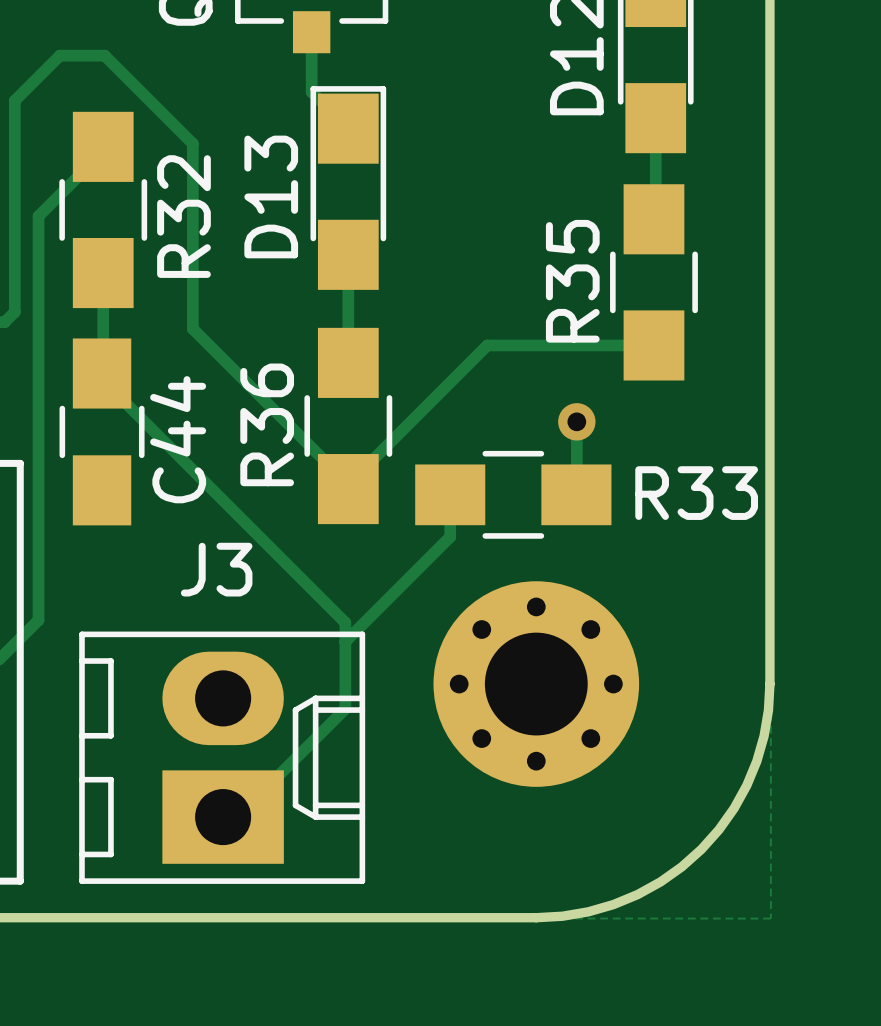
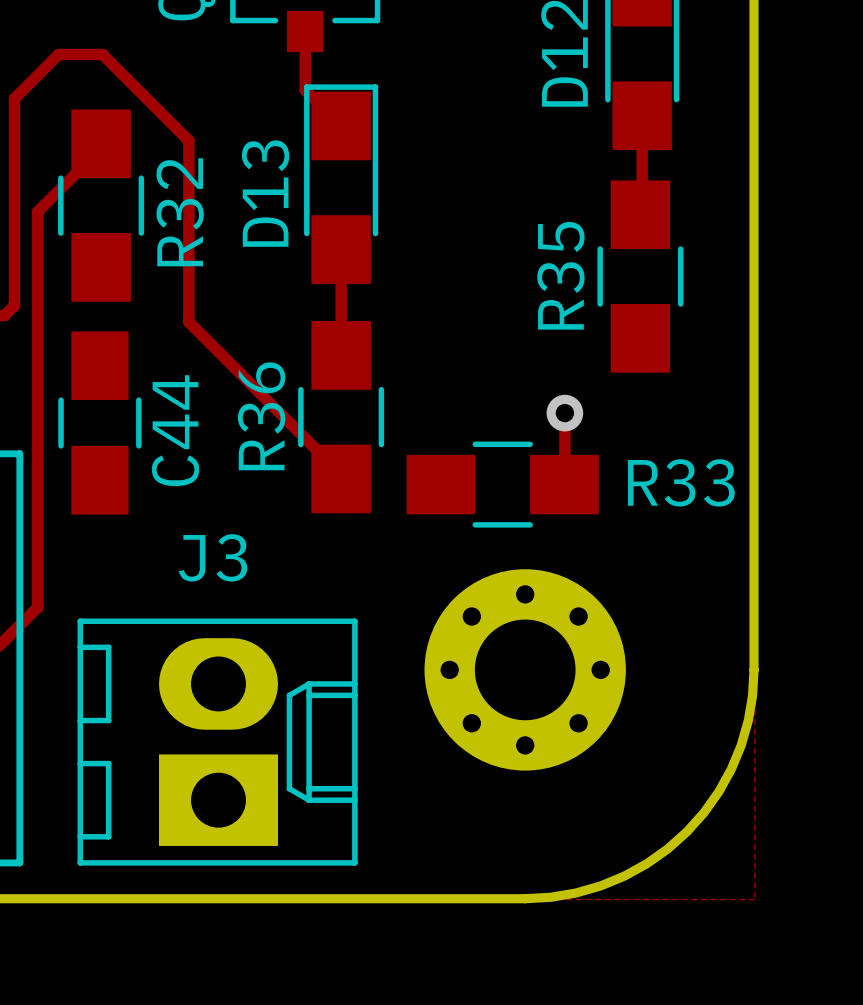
track: (103, 273) (102, 379) (345, 622) (345, 708) (237, 817) (223, 817) -> none
track: (653, 345) (487, 345) (348, 484) (348, 489) -> none
track: (450, 494) (450, 536) (345, 641) -> none

